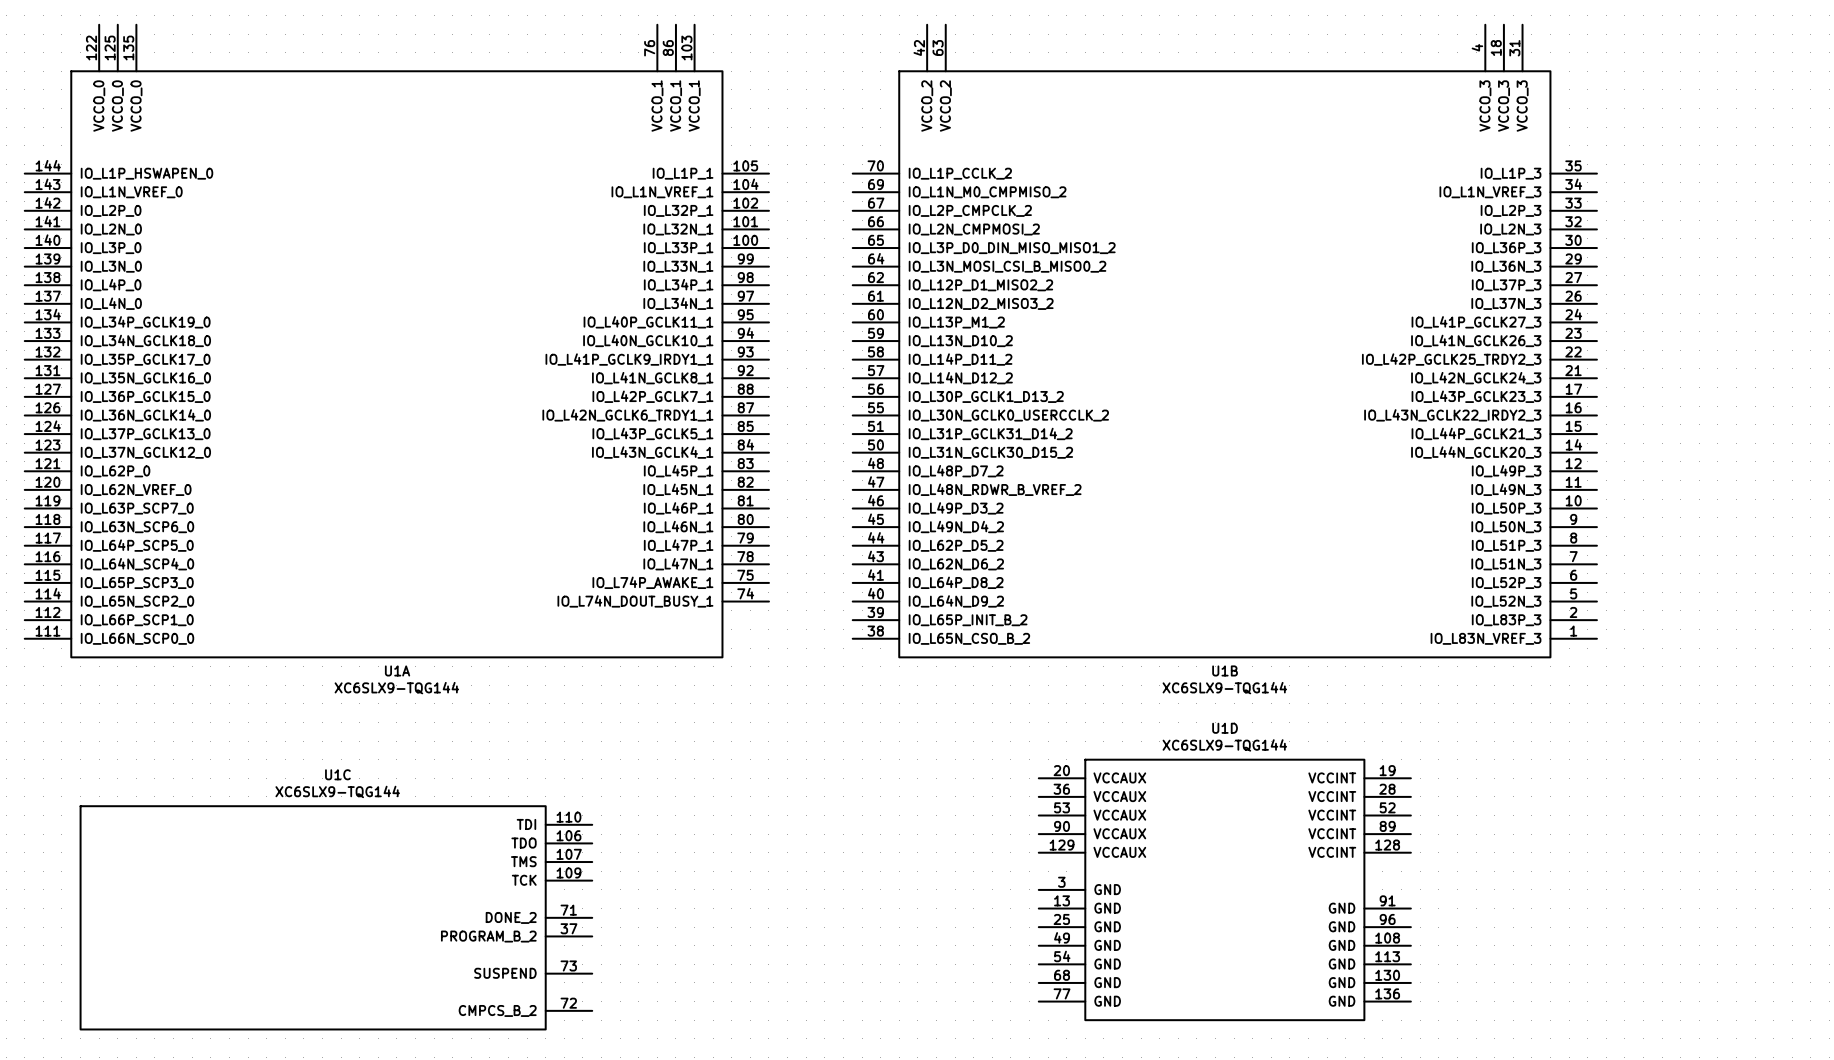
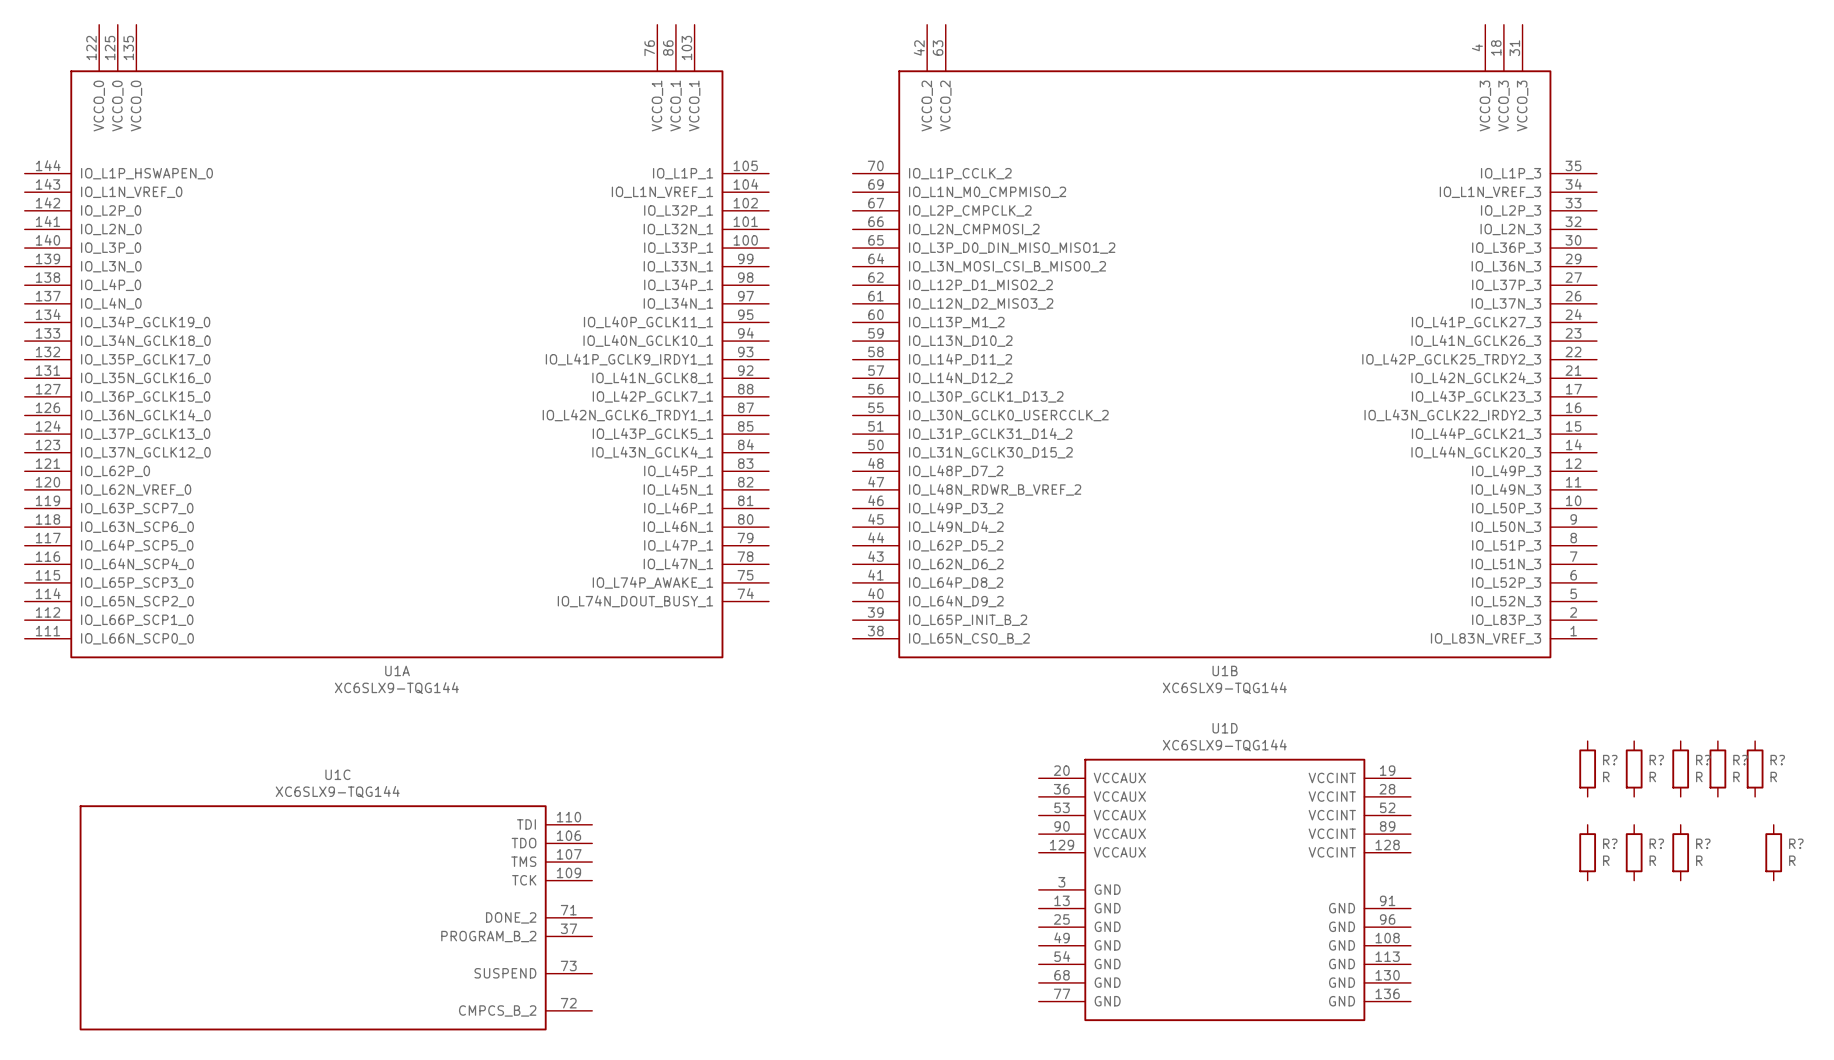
R?: none -> R (1587, 768)
R?: none -> R (1634, 768)
R?: none -> R (1680, 768)
R?: none -> R (1717, 768)
R?: none -> R (1755, 768)
R?: none -> R (1587, 852)
R?: none -> R (1634, 852)
R?: none -> R (1680, 852)
R?: none -> R (1773, 852)

